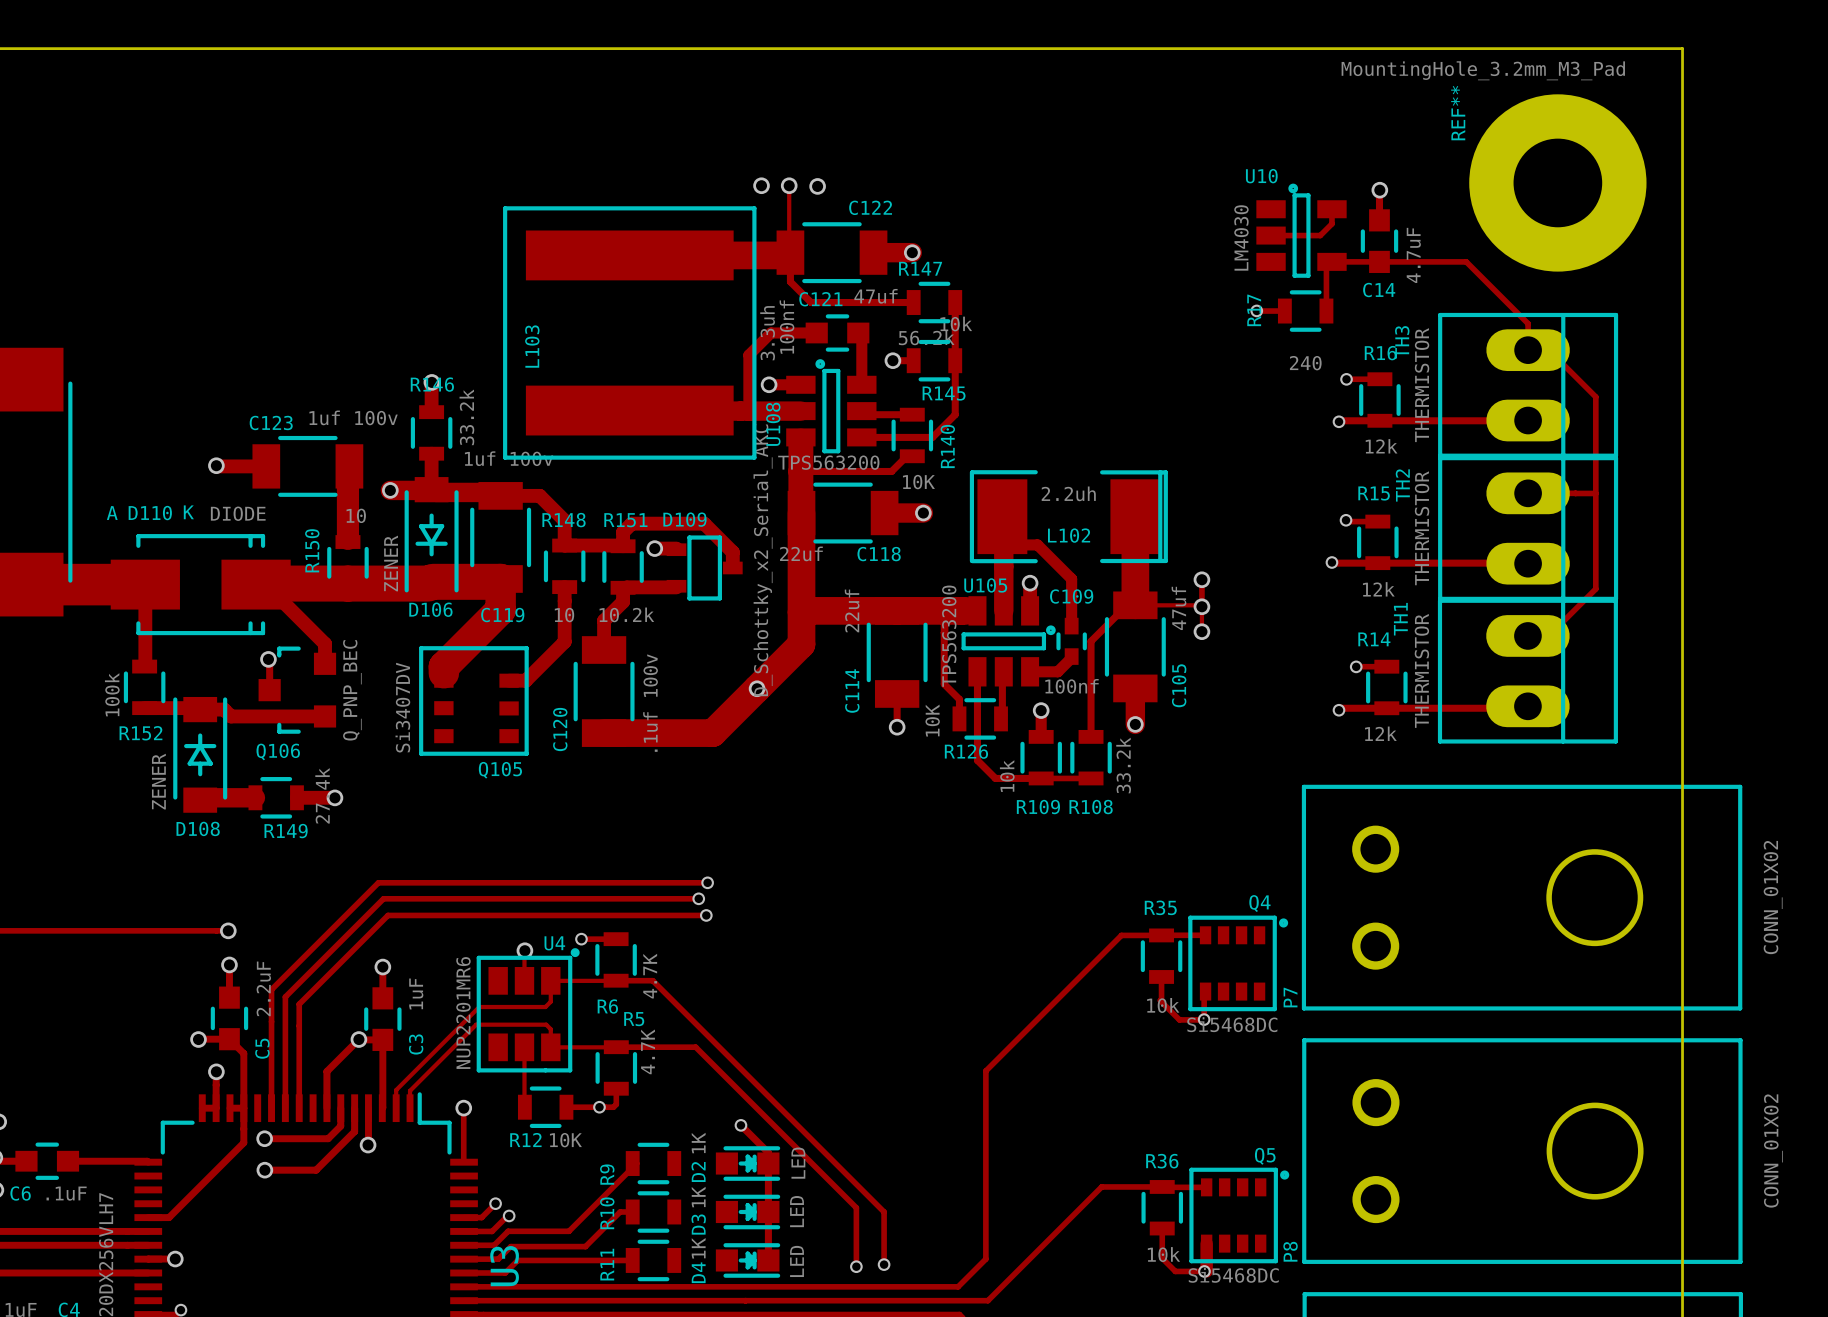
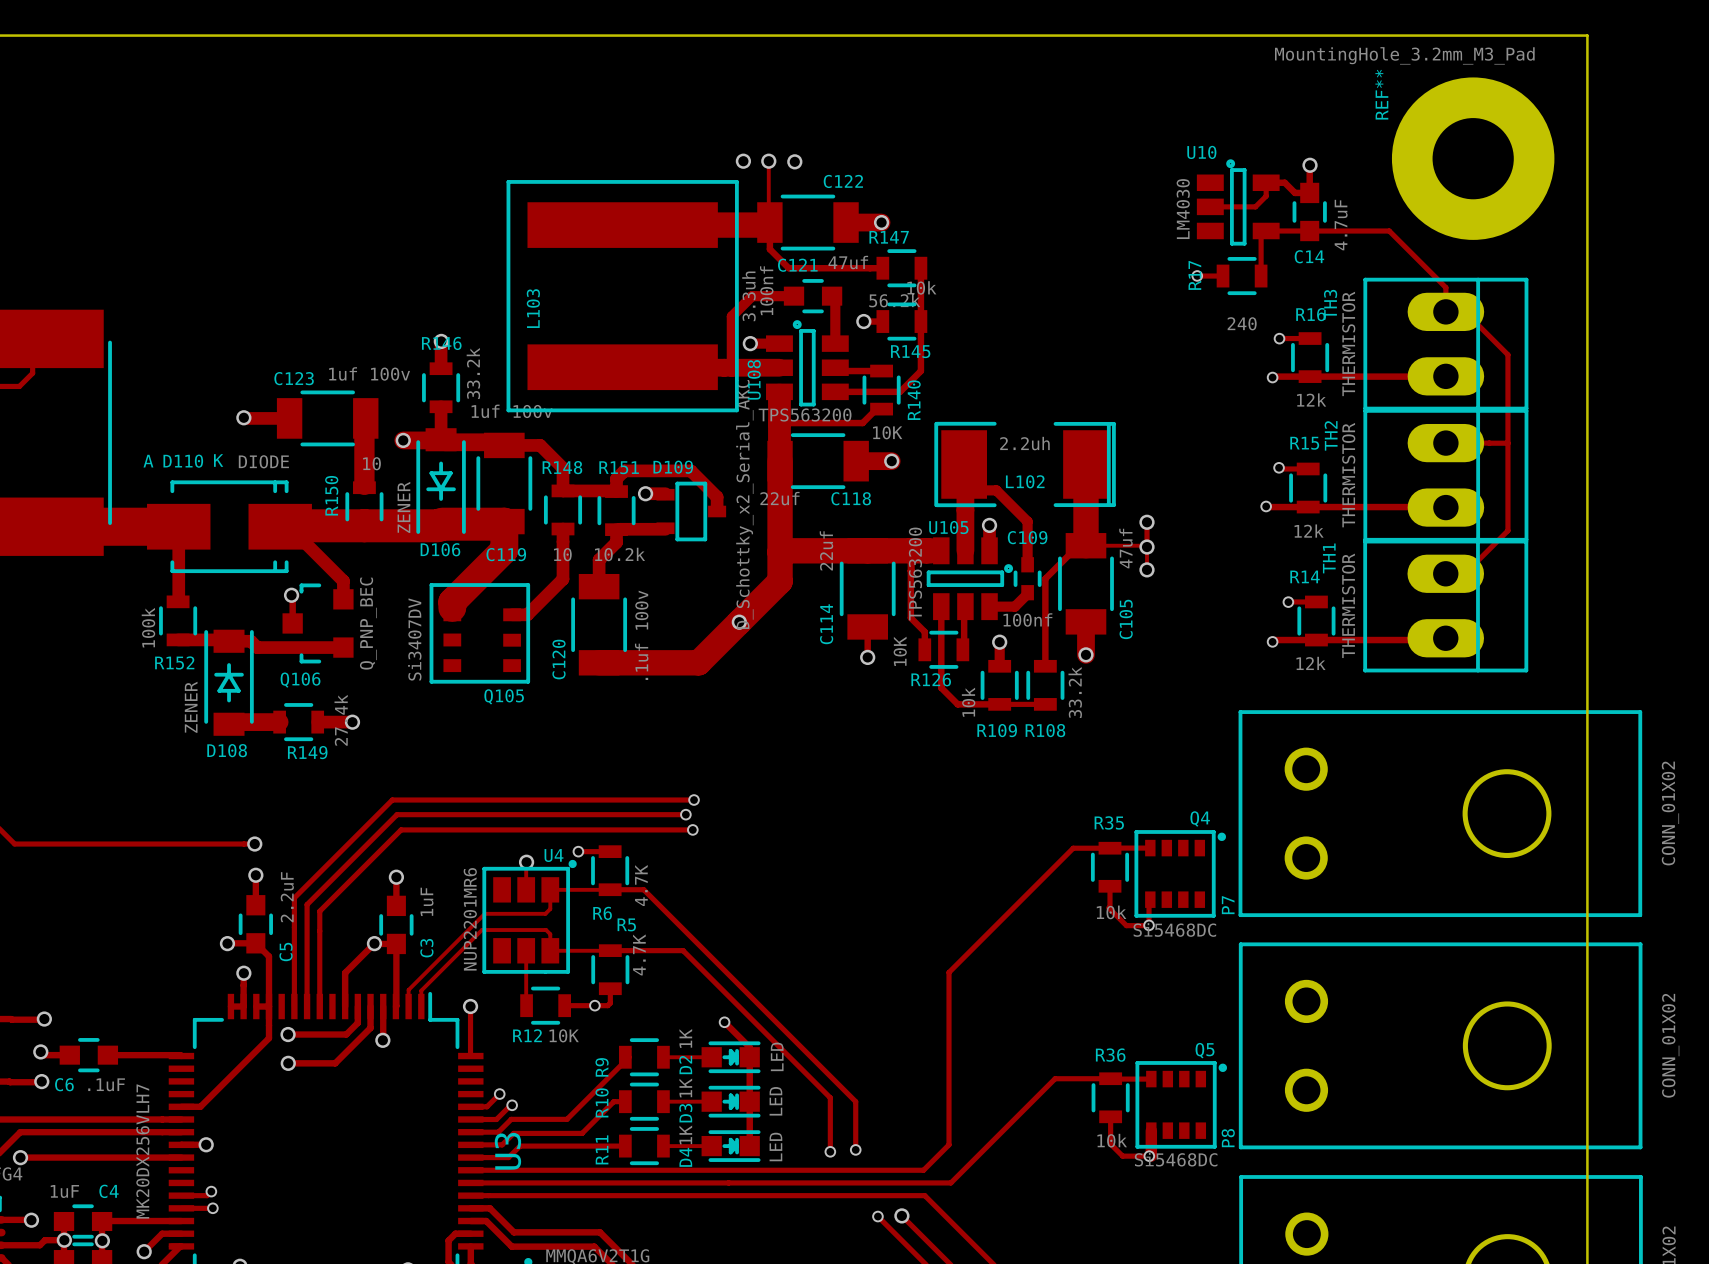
track: none -> (1266, 182) (1284, 182) (1294, 192) (1309, 192)
track: none -> (663, 1057) (711, 1057)
track: none -> (663, 1101) (711, 1101)
track: none -> (663, 1146) (711, 1146)

